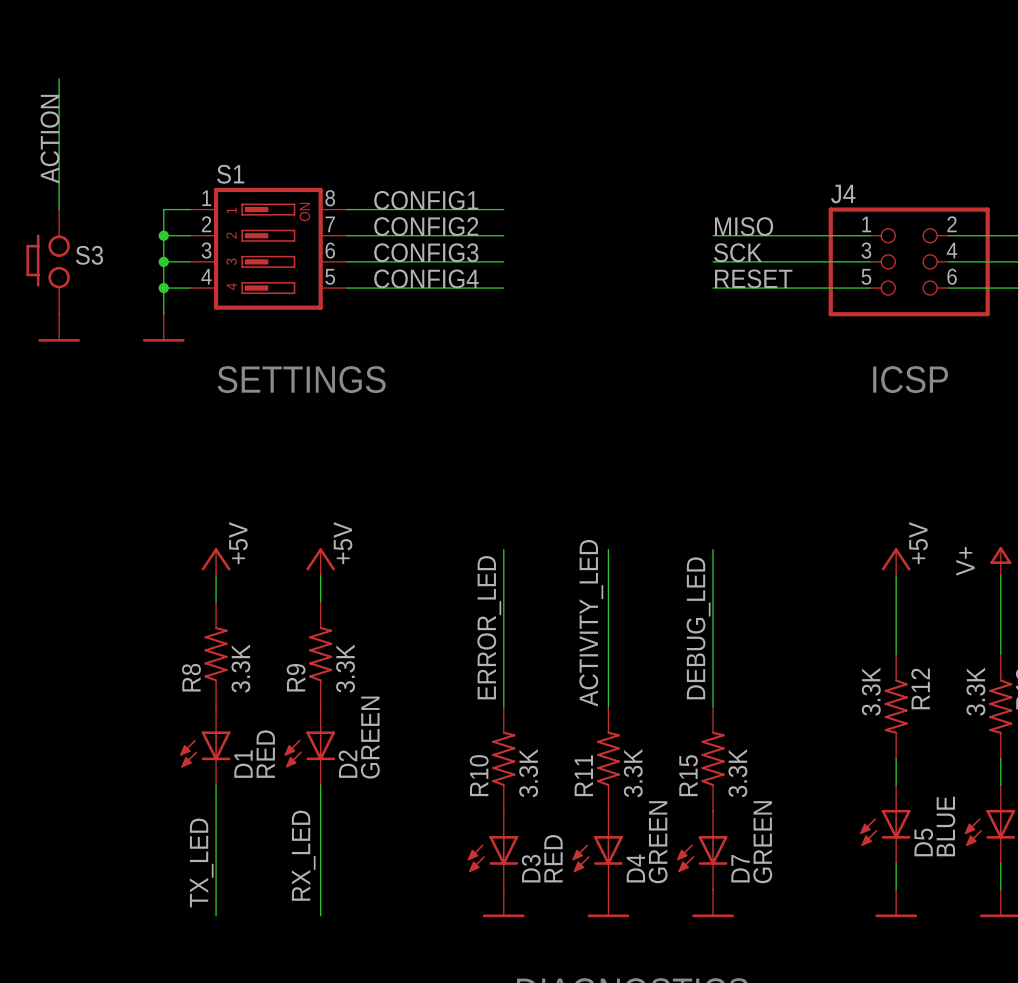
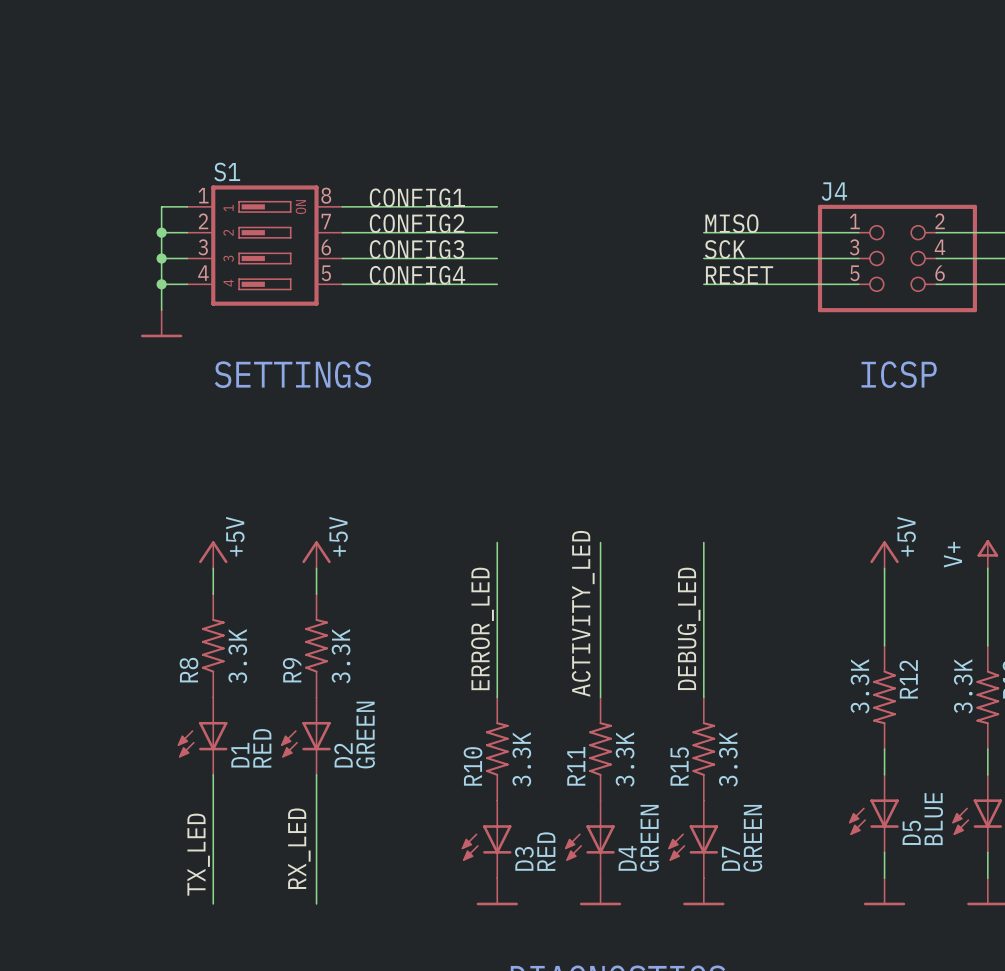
wire: (59, 78) (59, 209) -> none
label: ACTION (49, 139) -> none
S3: (48, 261) -> none
power symbol: (59, 327) -> none

